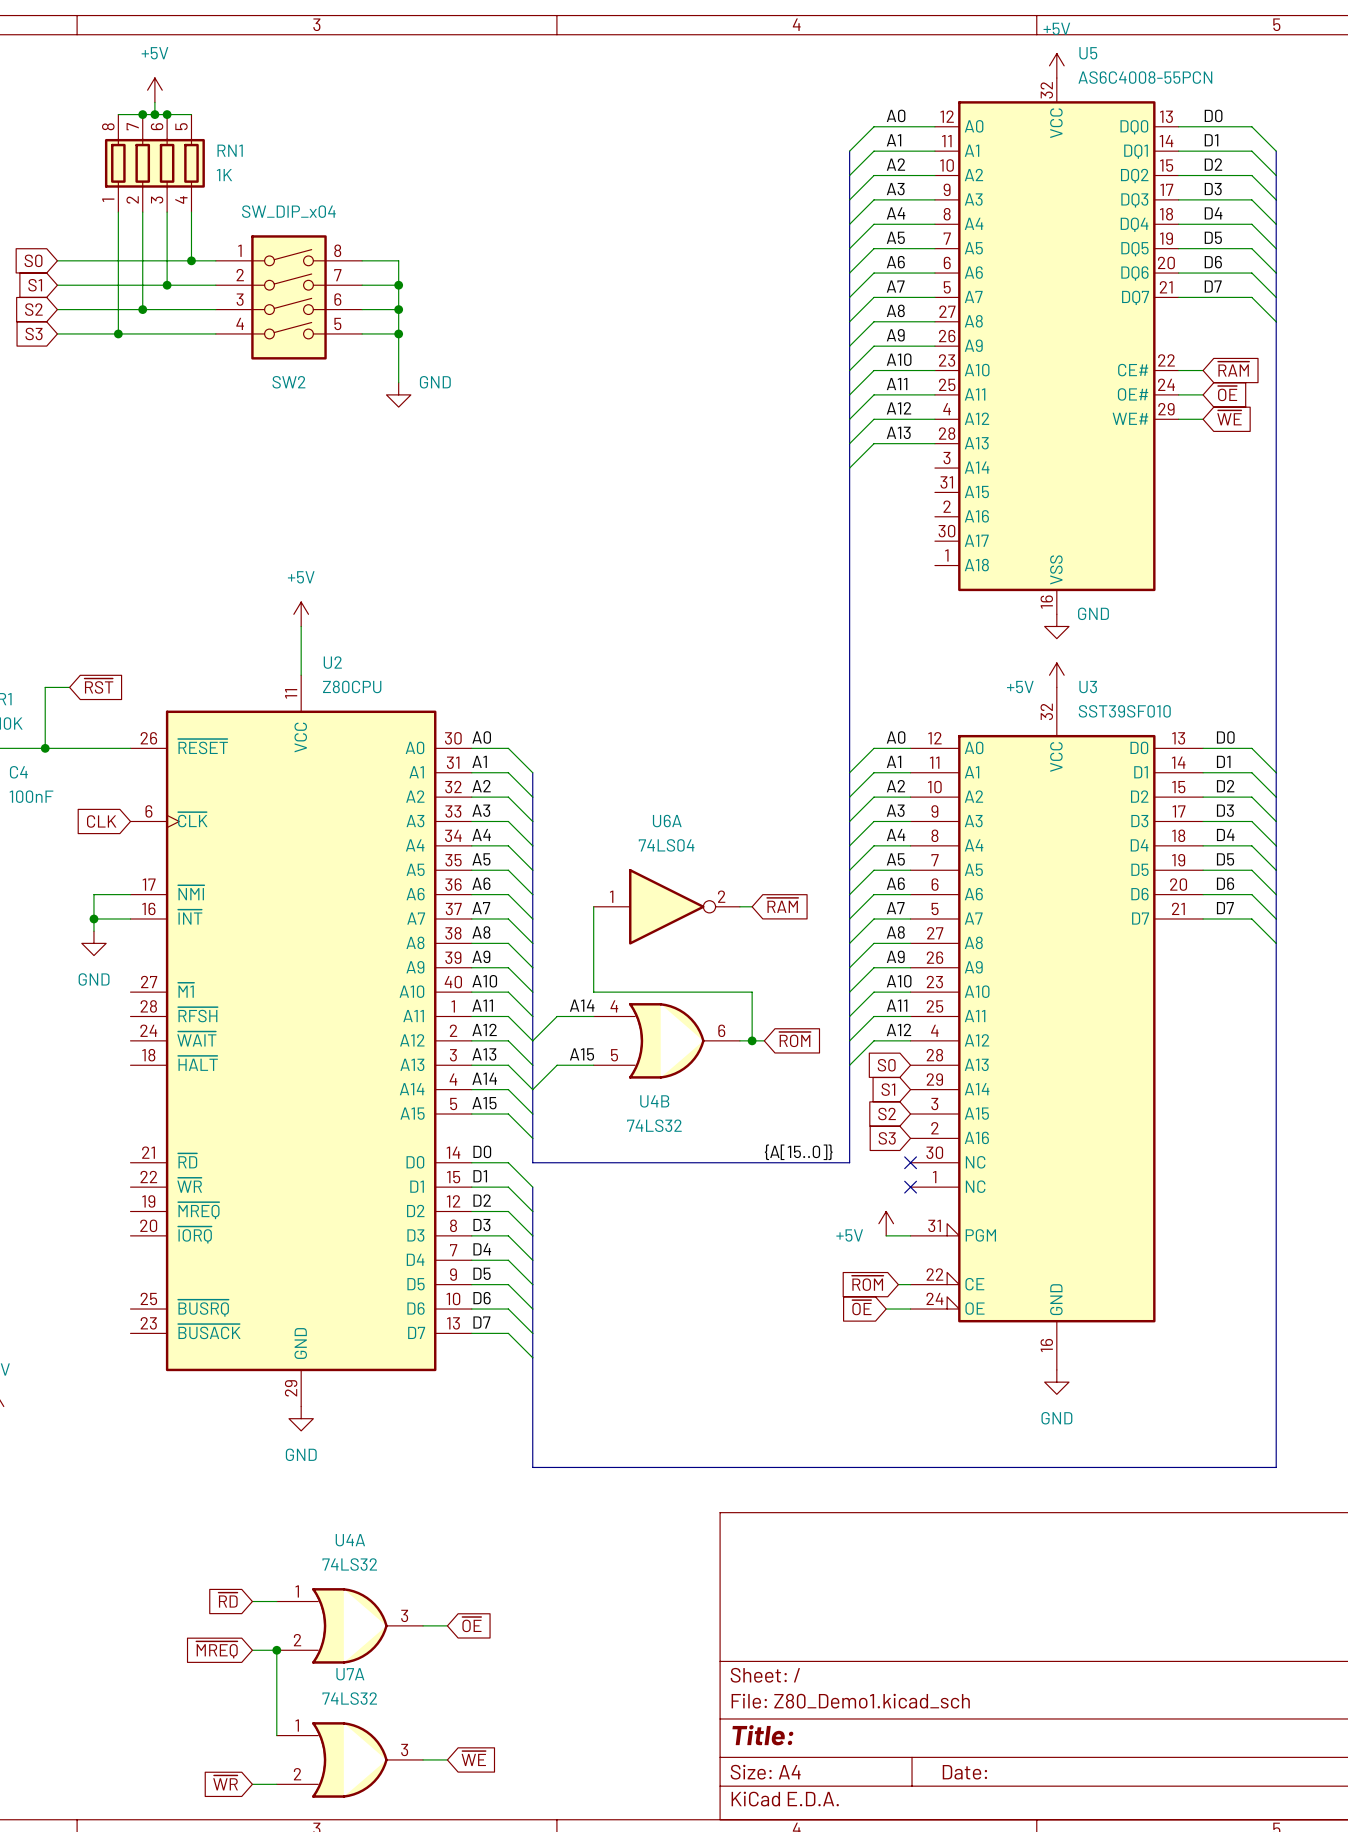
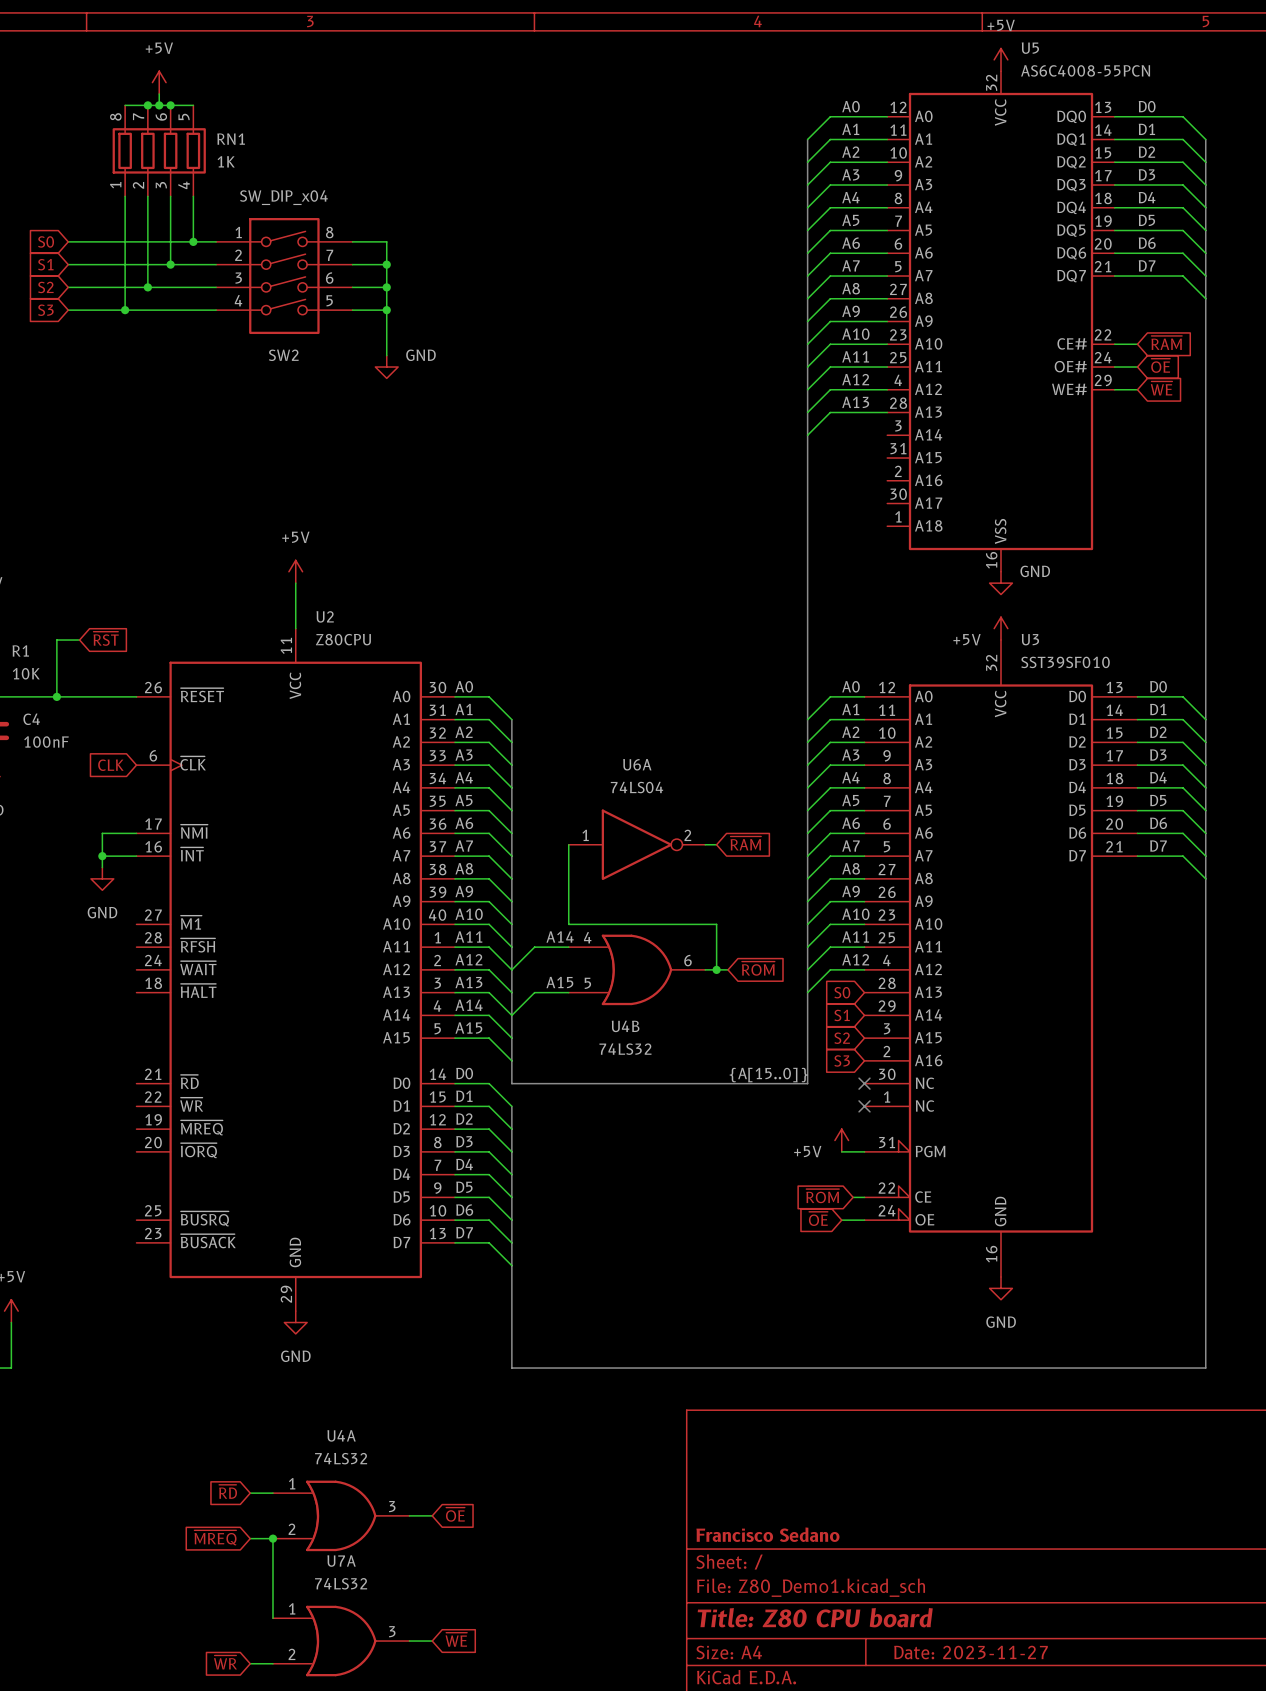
title block: none -> Francisco Sedano (767, 1534)
title block: Title: (762, 1735) -> Title: Z80 CPU board (815, 1617)
title block: Date: (964, 1772) -> Date: 2023-11-27 (971, 1652)

